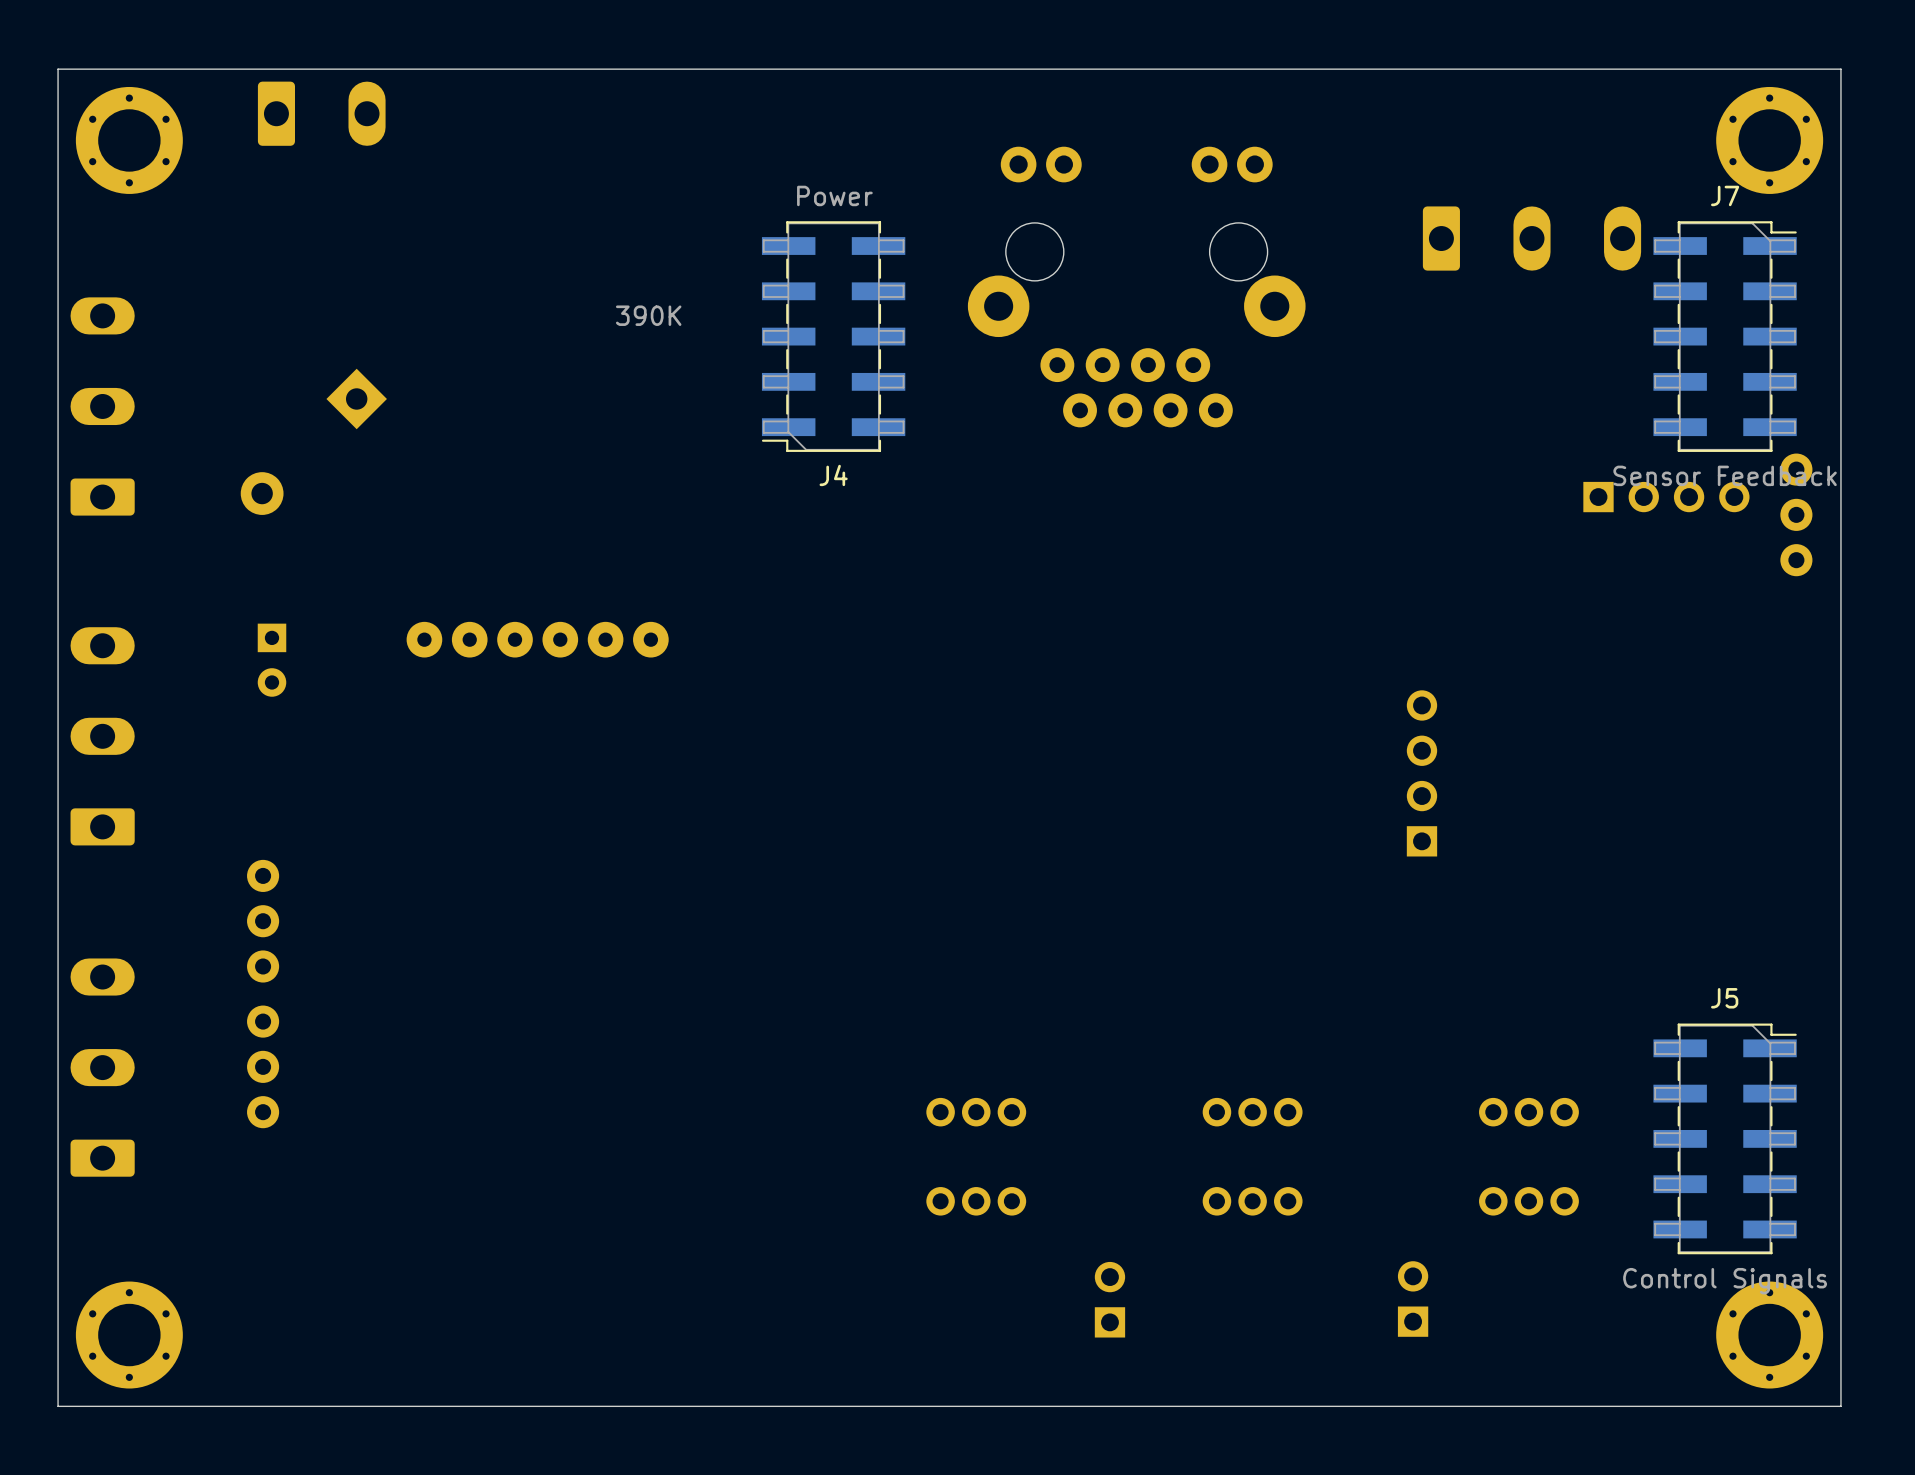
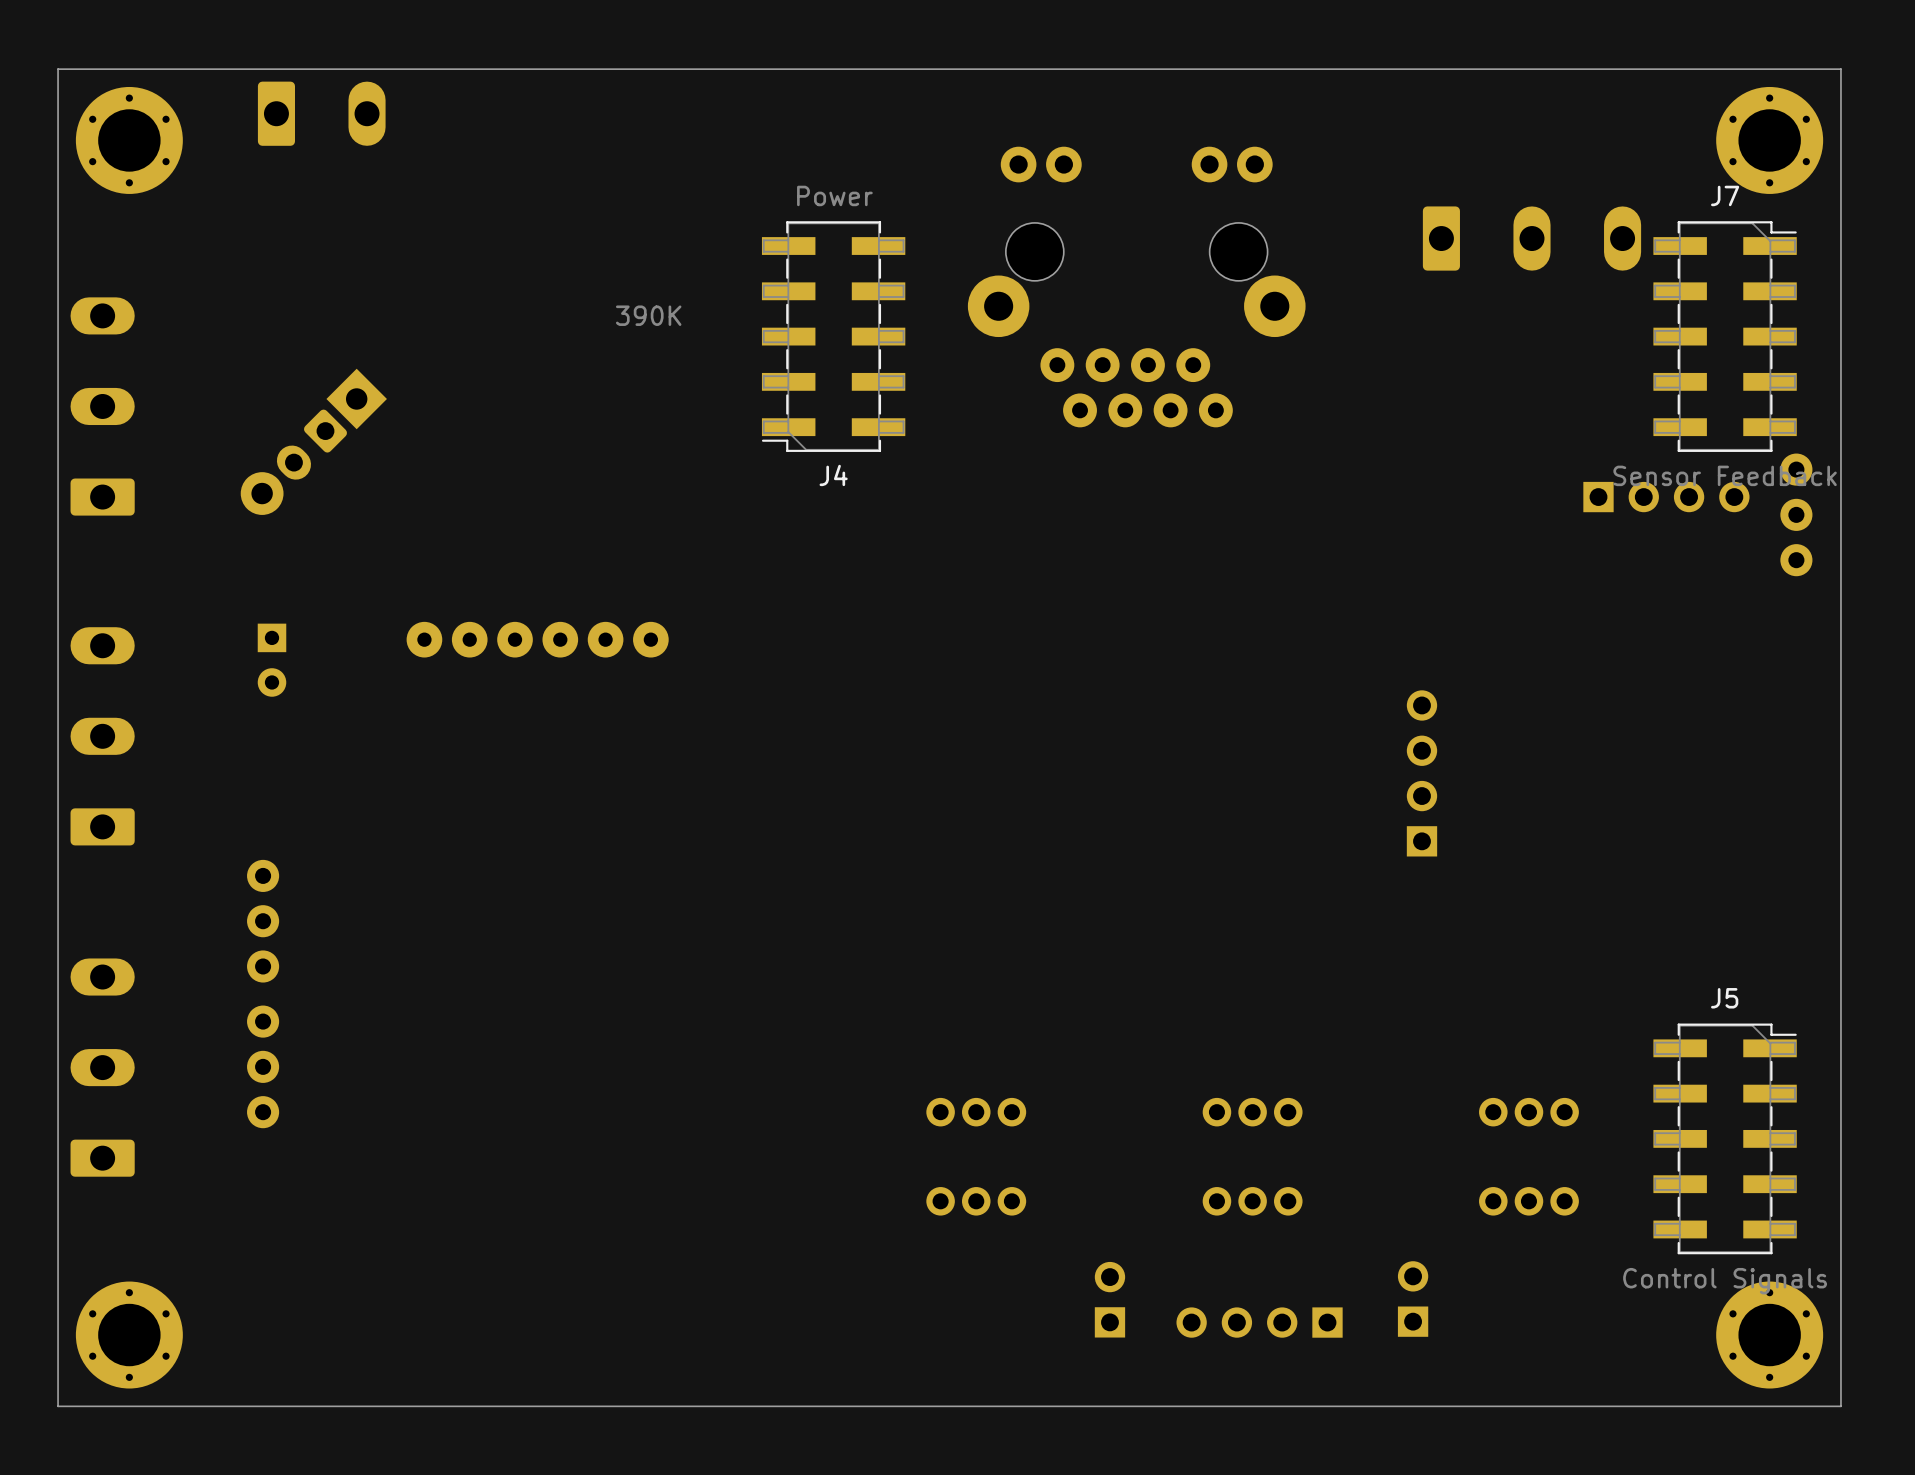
part: none -> (311, 444)
part: none -> (1259, 1322)

